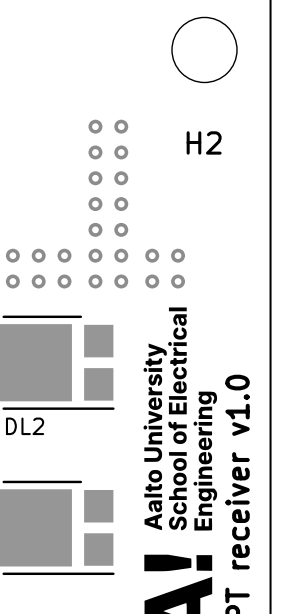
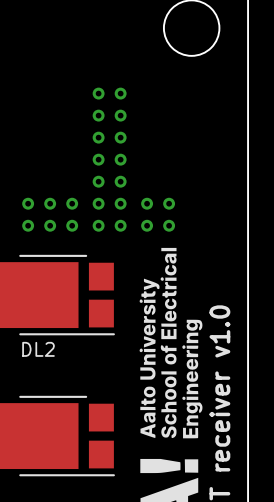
H2 name: H2 (204, 142) -> none

